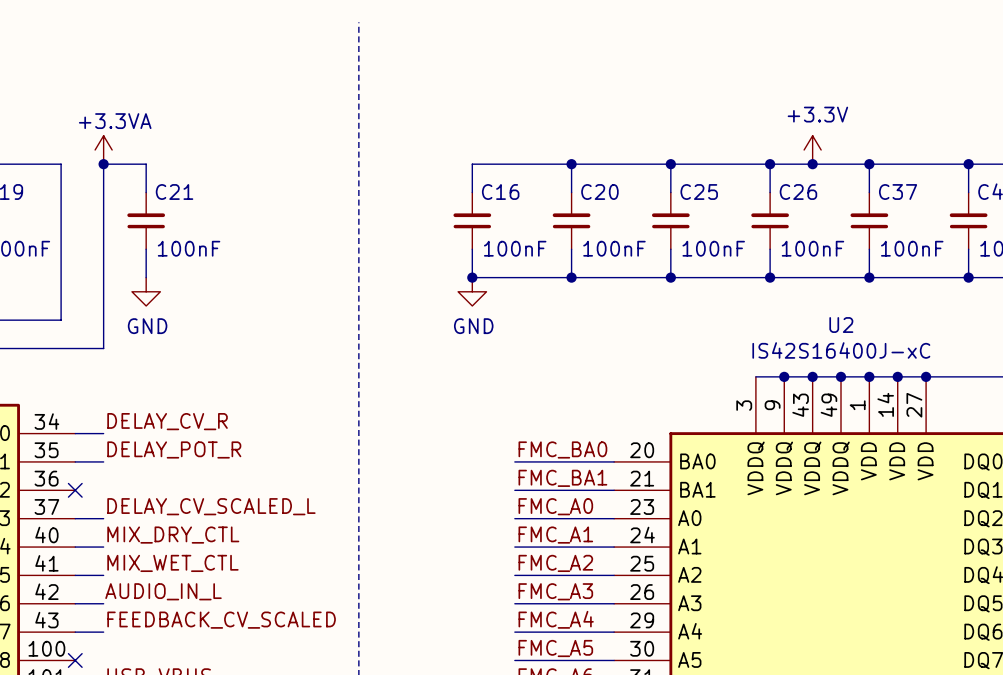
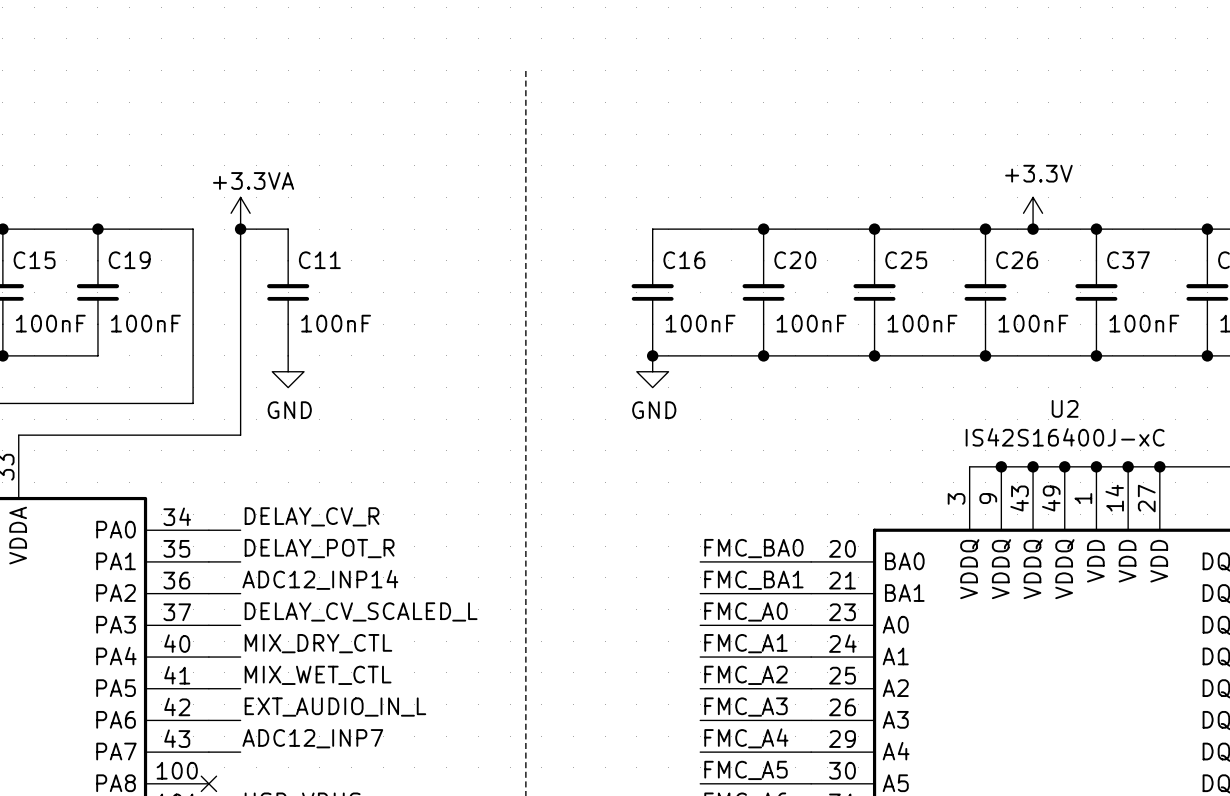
C21 name: C21 (174, 192) -> C11 (319, 260)
label: none -> ADC12_INP14 (320, 579)
wire: none -> (208, 593) (240, 593)
no-connect mark: (75, 490) -> none
label: AUDIO_IN_L (163, 591) -> EXT_AUDIO_IN_L (335, 707)
label: FEEDBACK_CV_SCALED (221, 620) -> ADC12_INP7 (312, 738)

